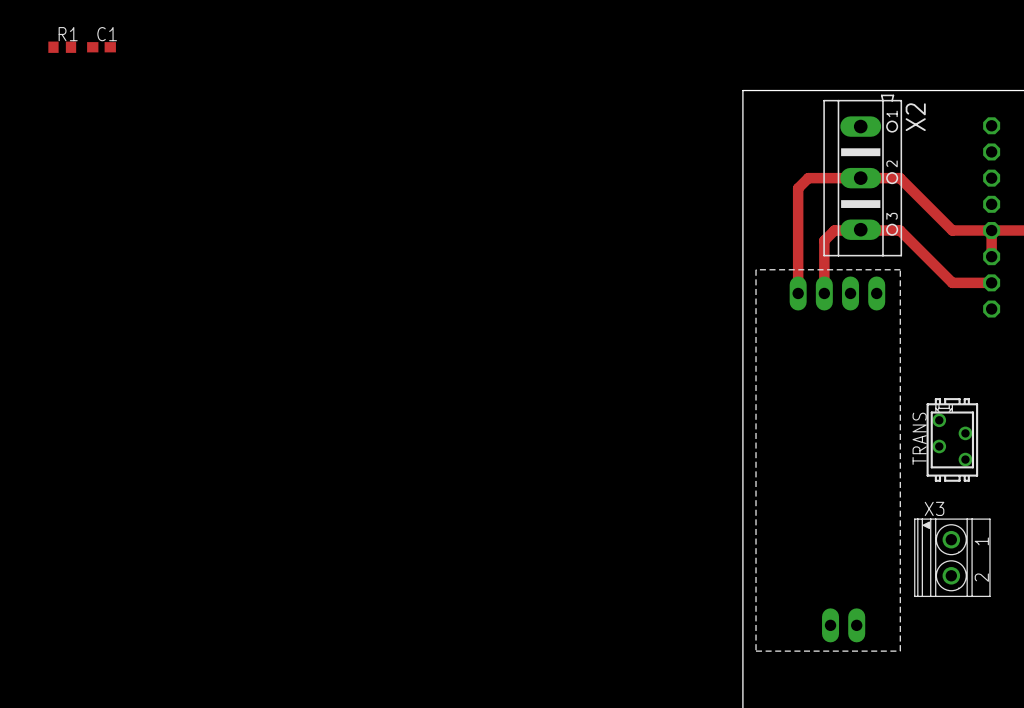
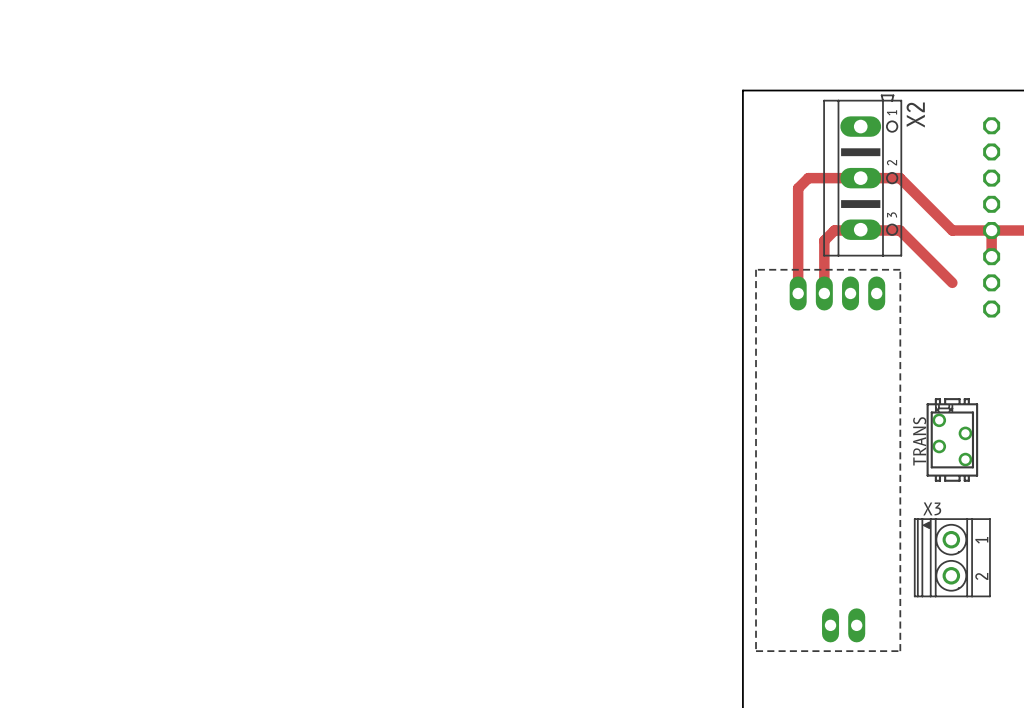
R1: (62, 47) -> none
C1: (101, 47) -> none
track: (952, 282) (991, 282) -> none

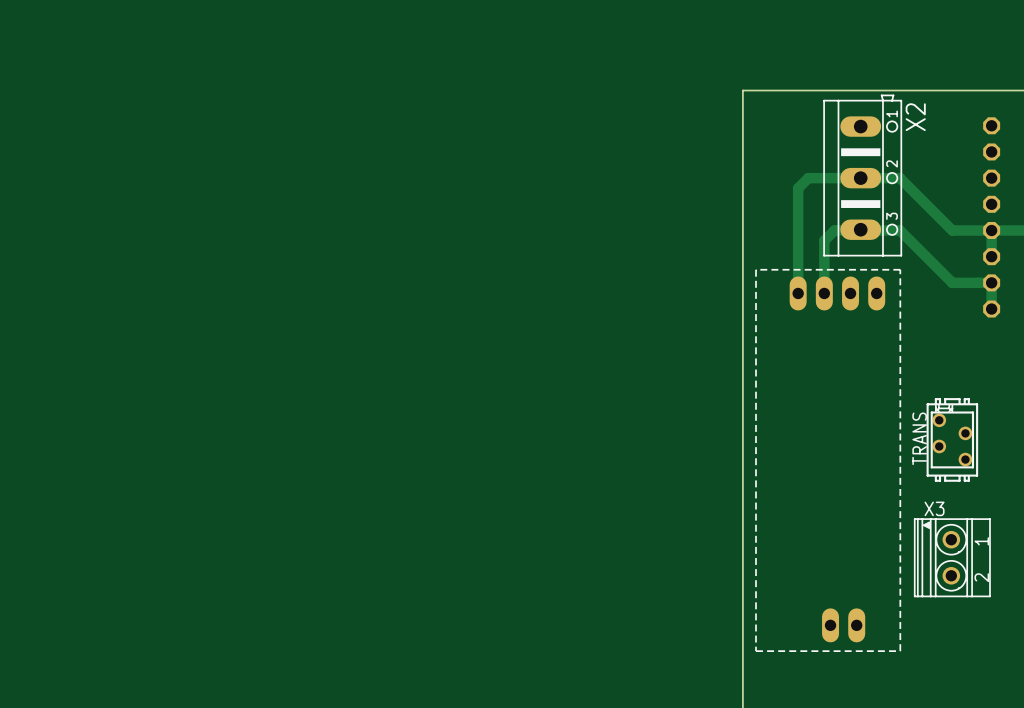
track: none -> (952, 282) (991, 282) (991, 309)

